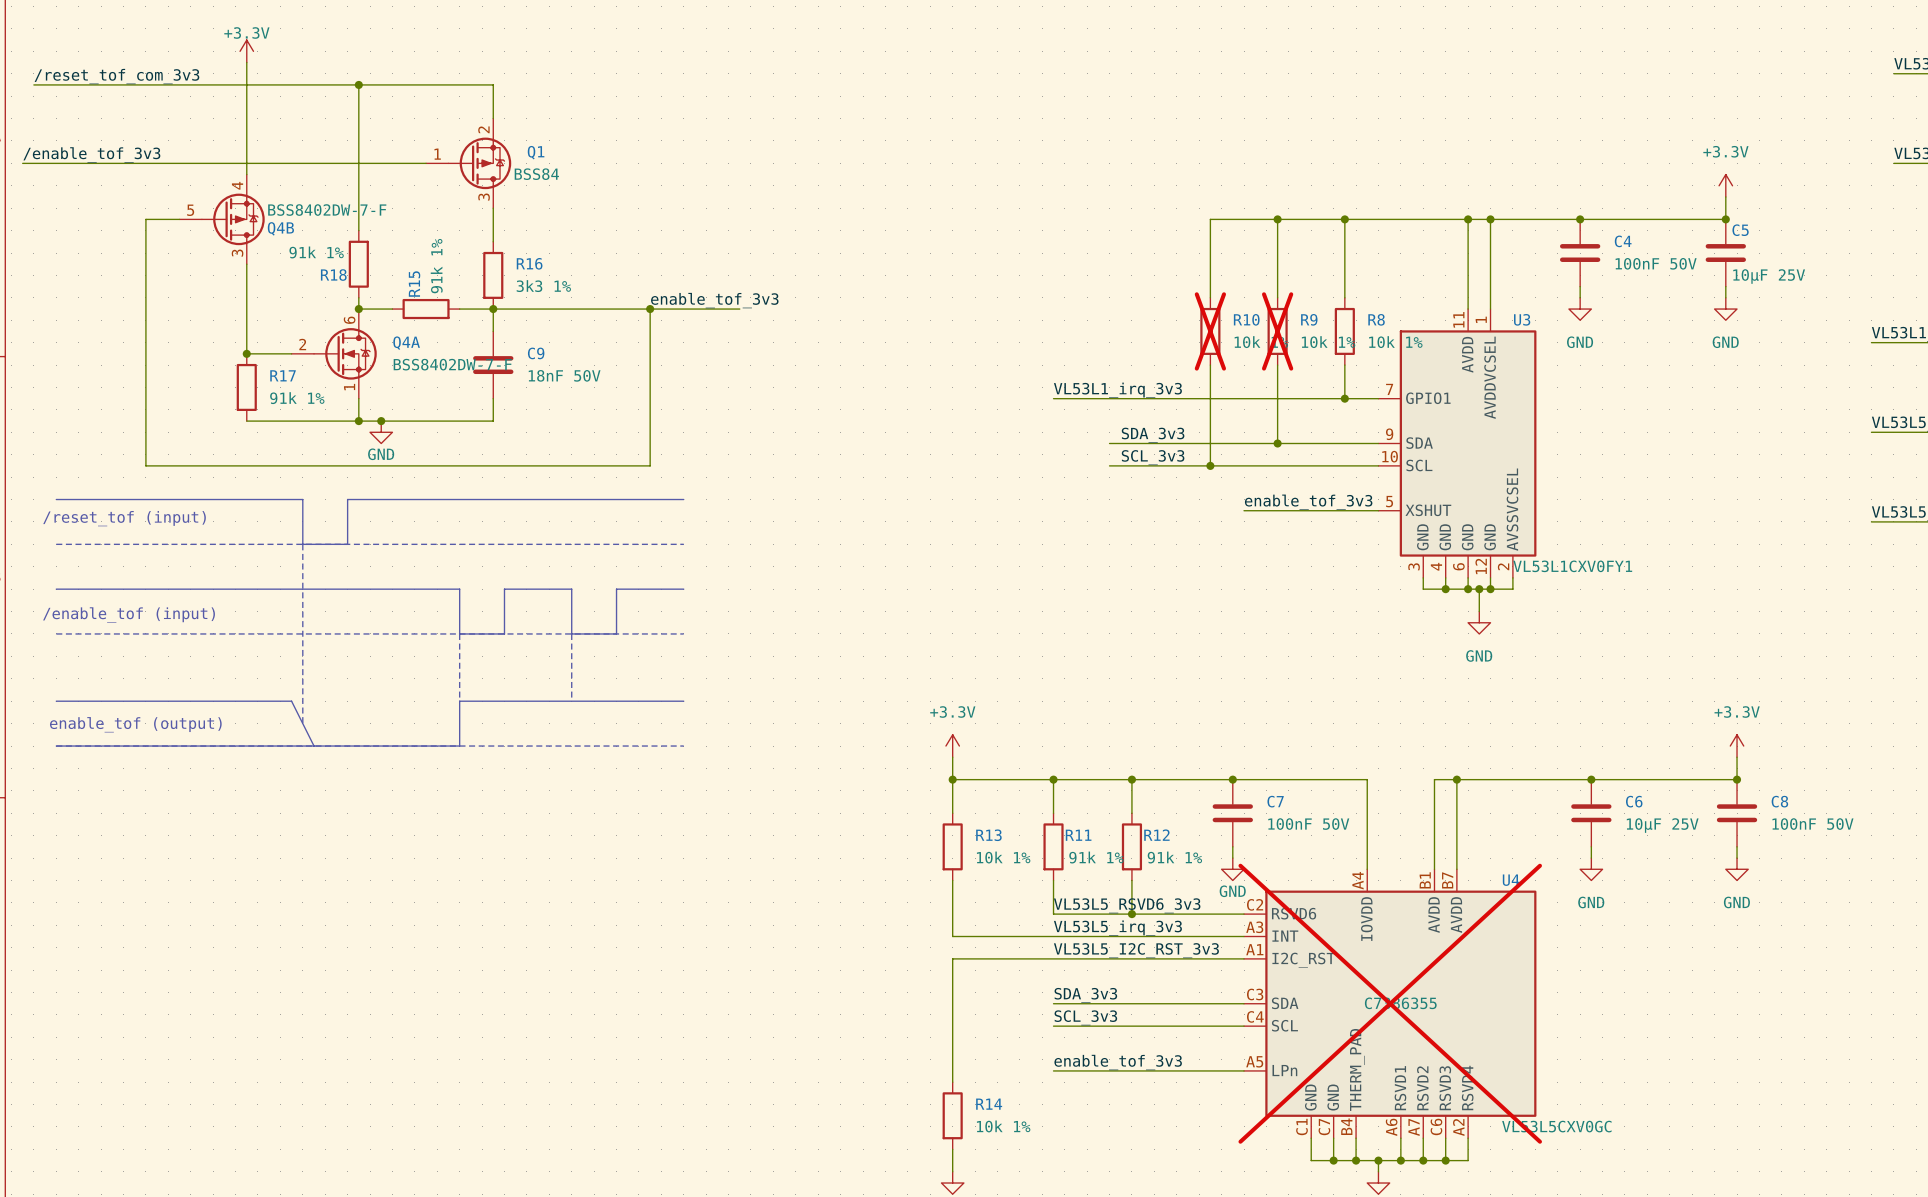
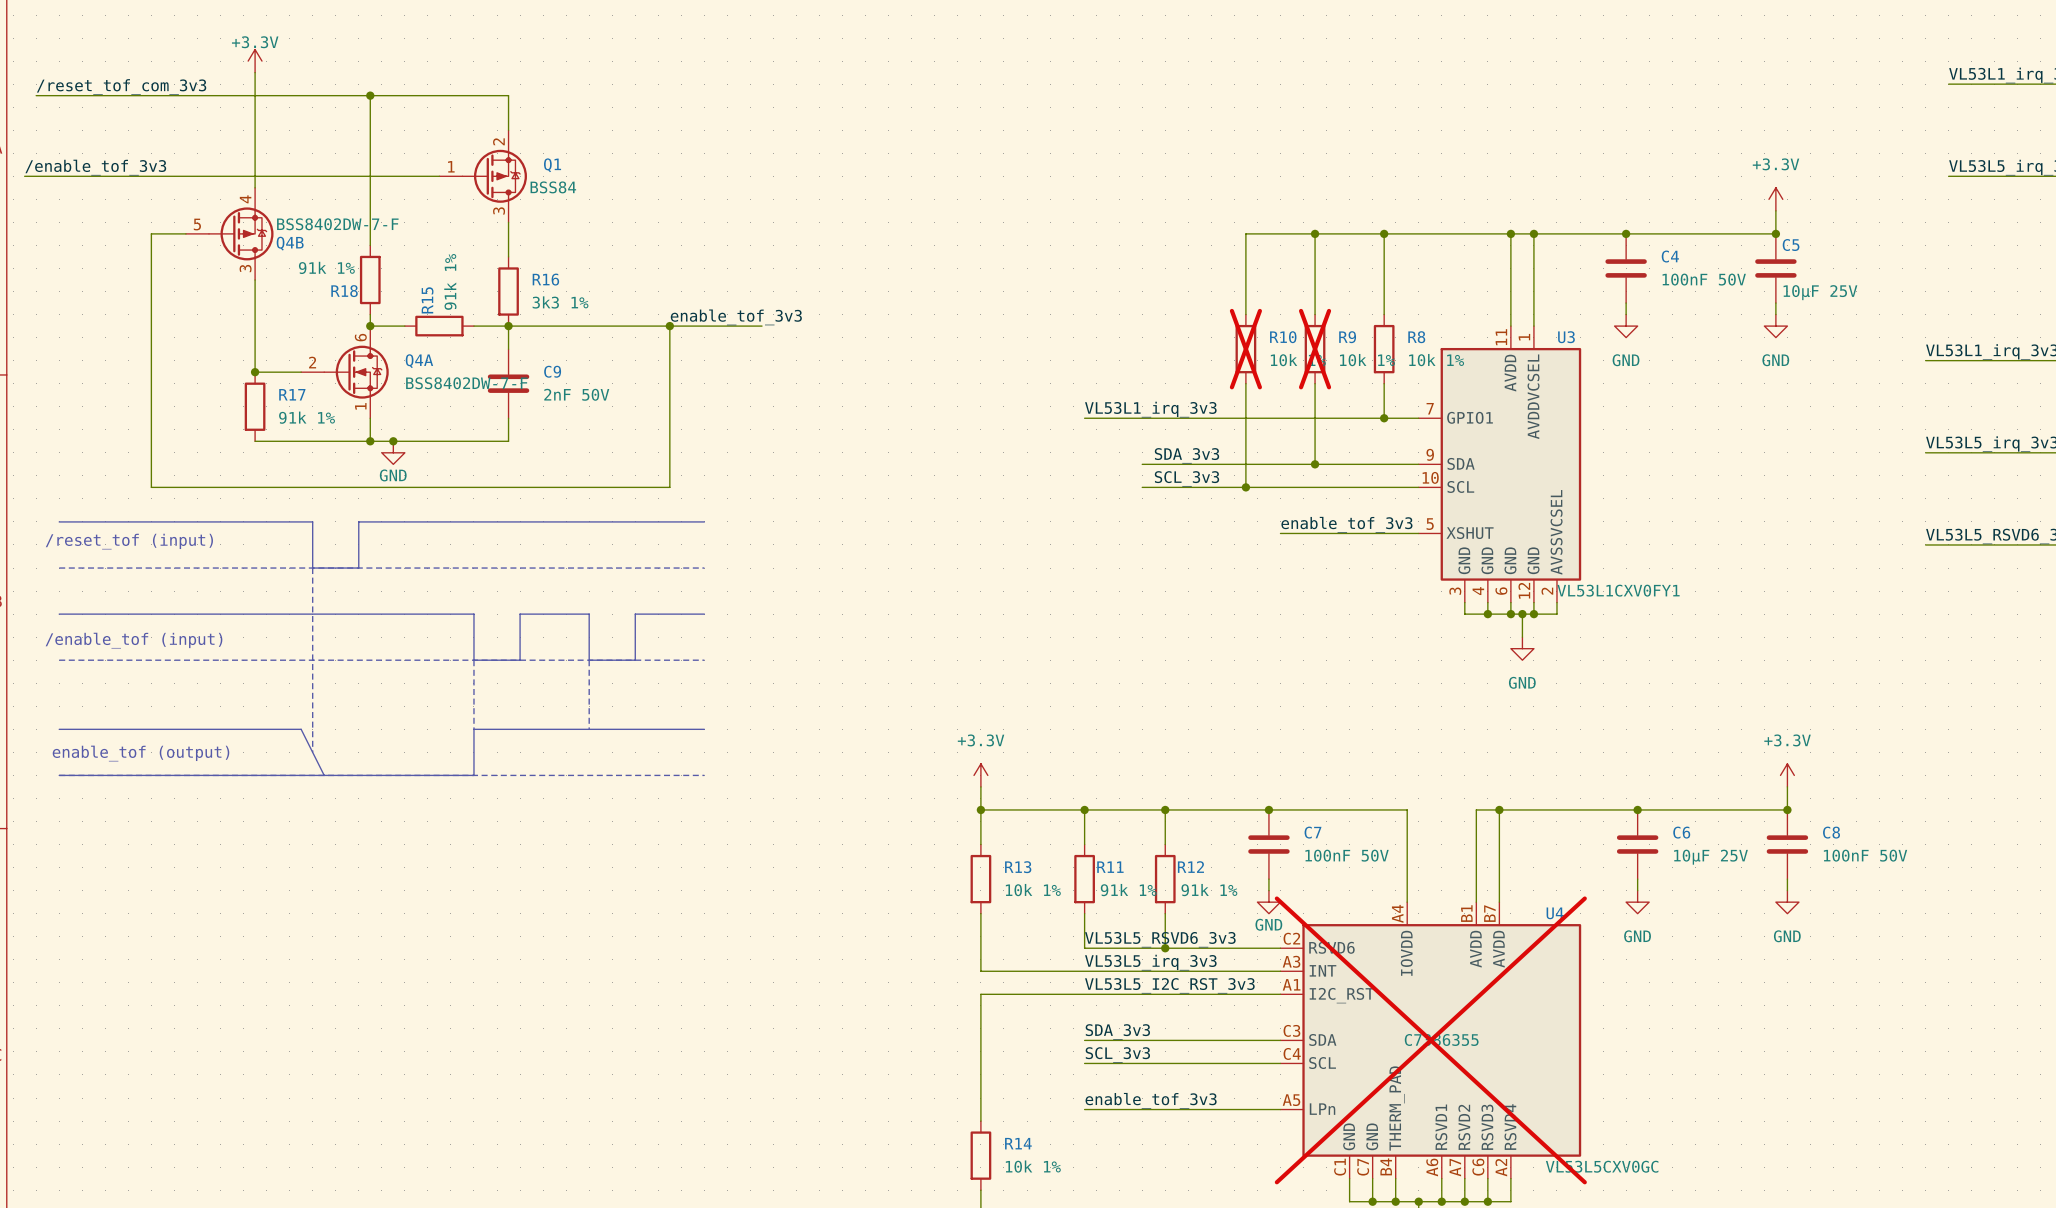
C9 value: 18nF 50V (564, 375) -> 2nF 50V (576, 394)

